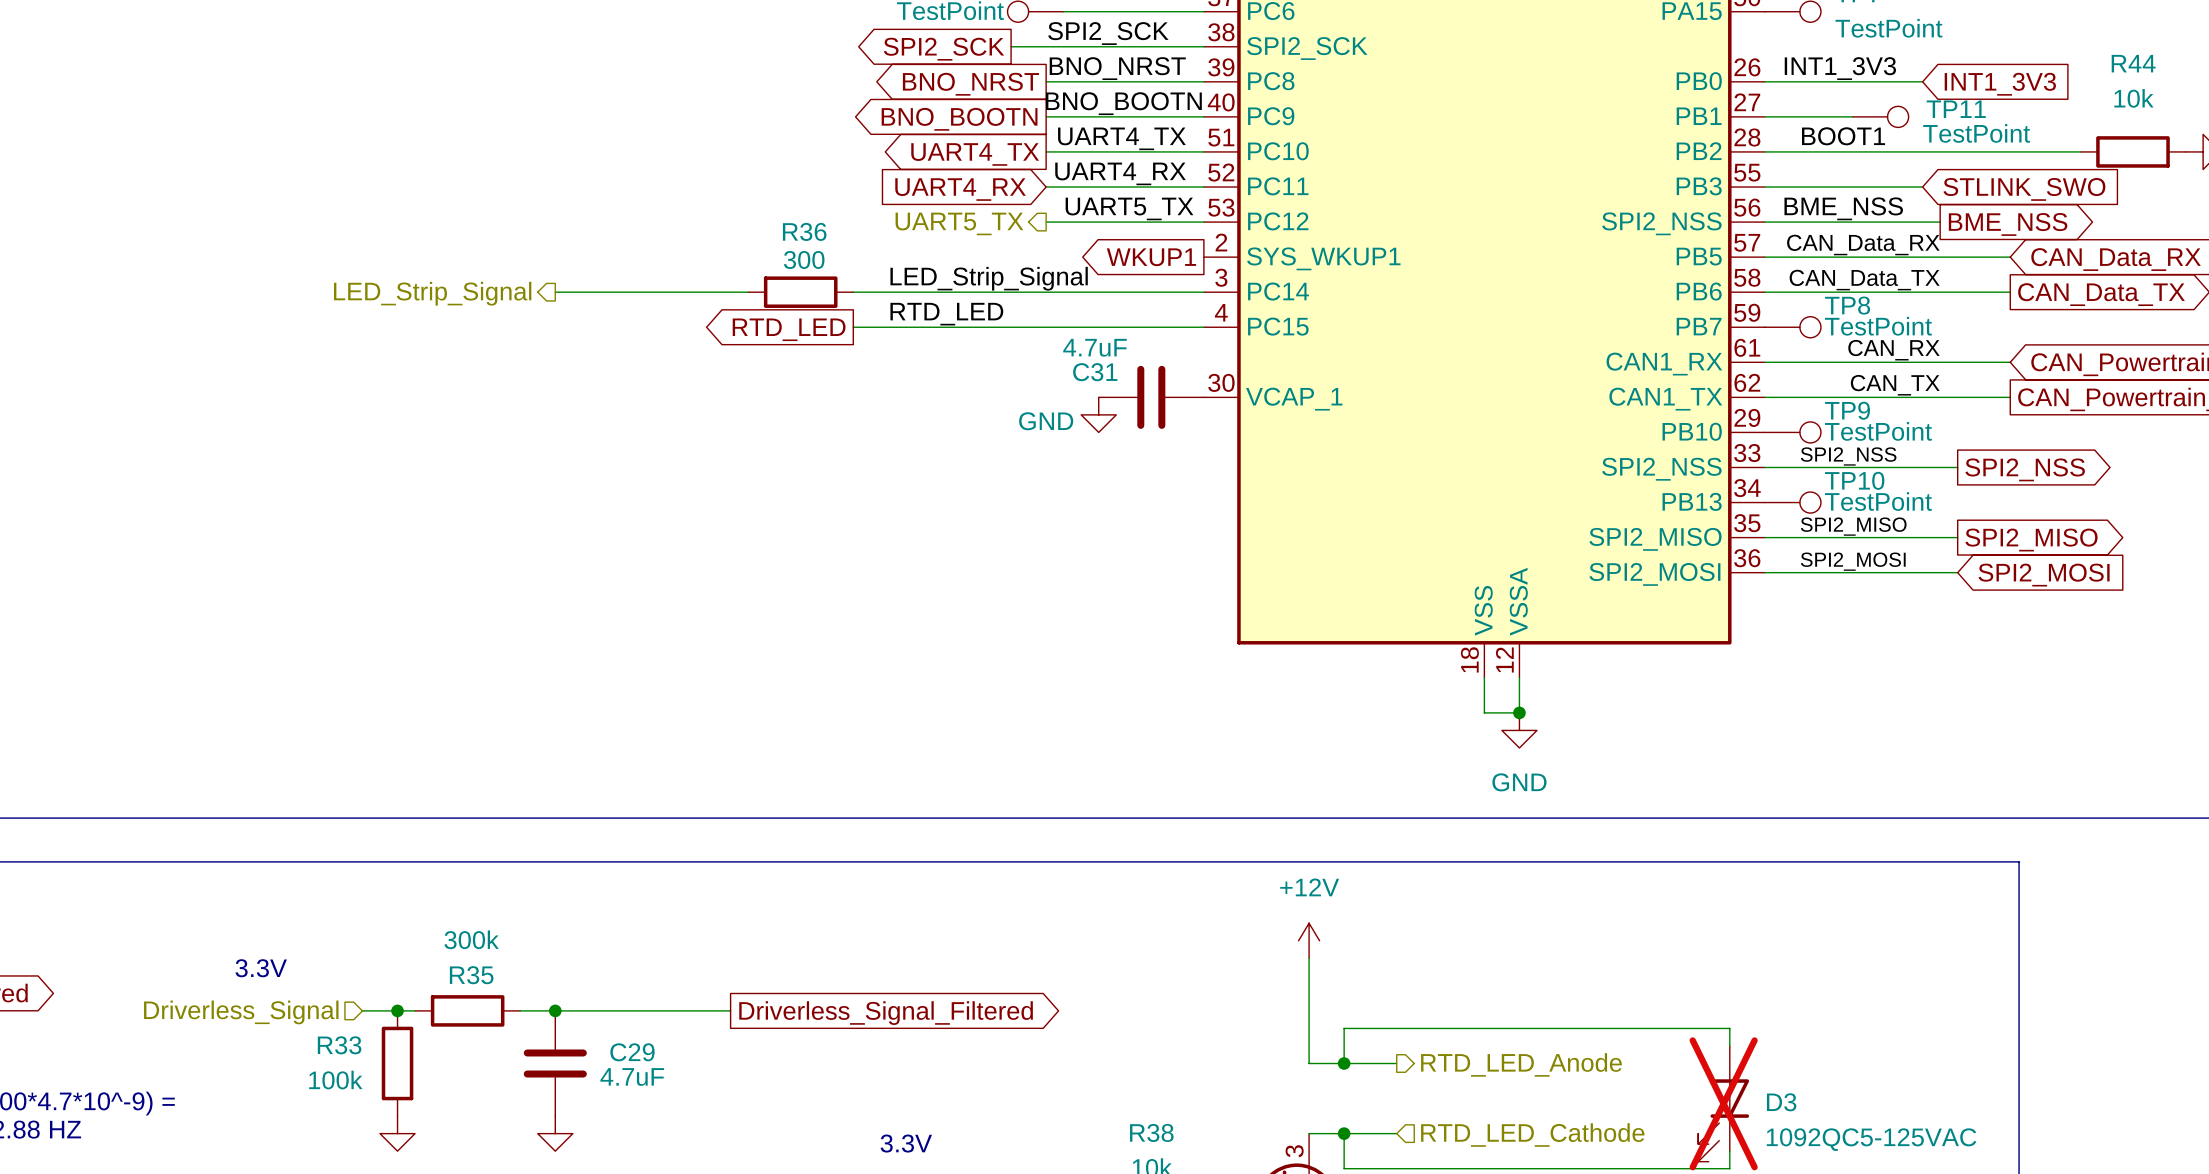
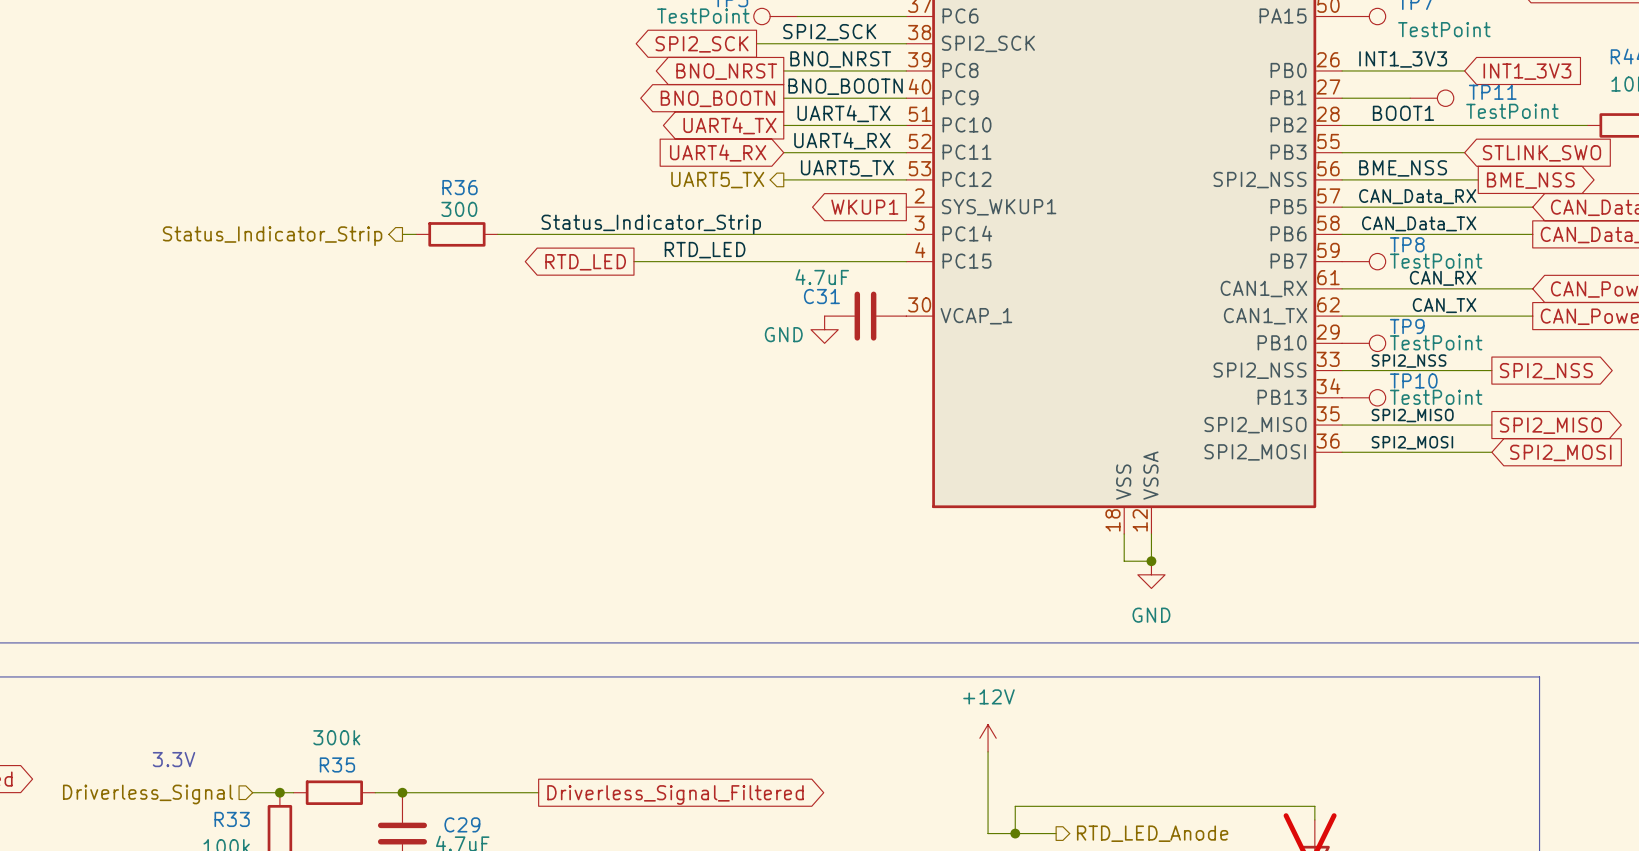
label: none -> Status_Indicator_Strip (651, 224)
label: LED_Strip_Signal (989, 278) -> none
wire: (572, 292) (678, 292) -> (552, 234) (633, 234)
R36 position: (800, 292) -> (456, 234)
hierarchical label: LED_Strip_Signal (432, 293) -> Status_Indicator_Strip (272, 236)

